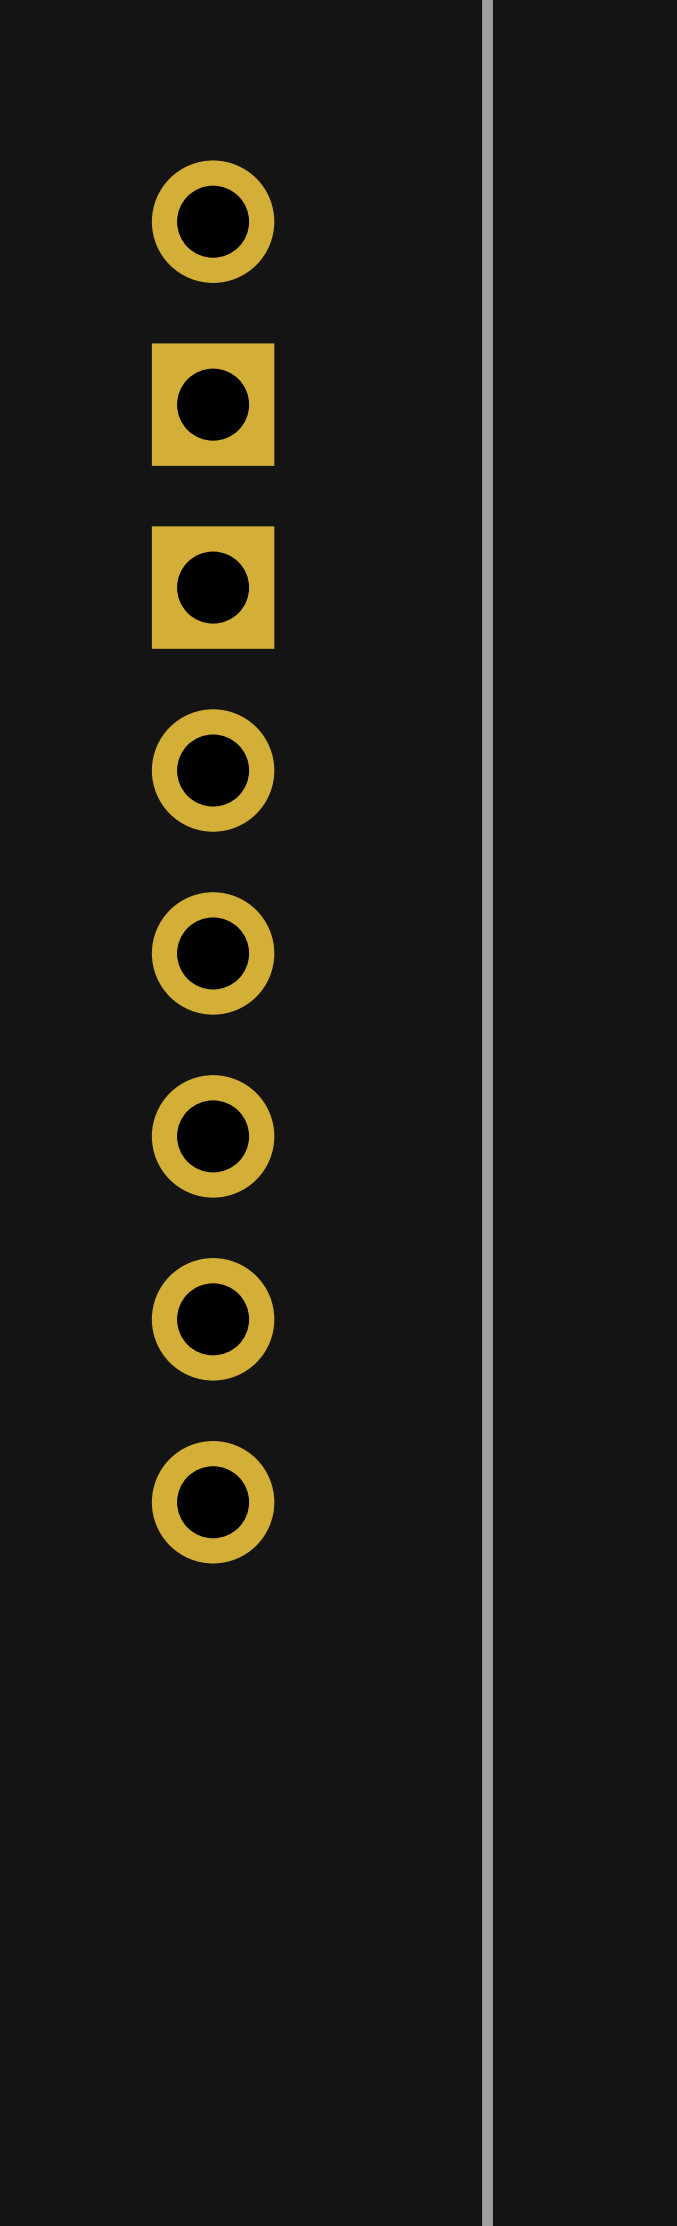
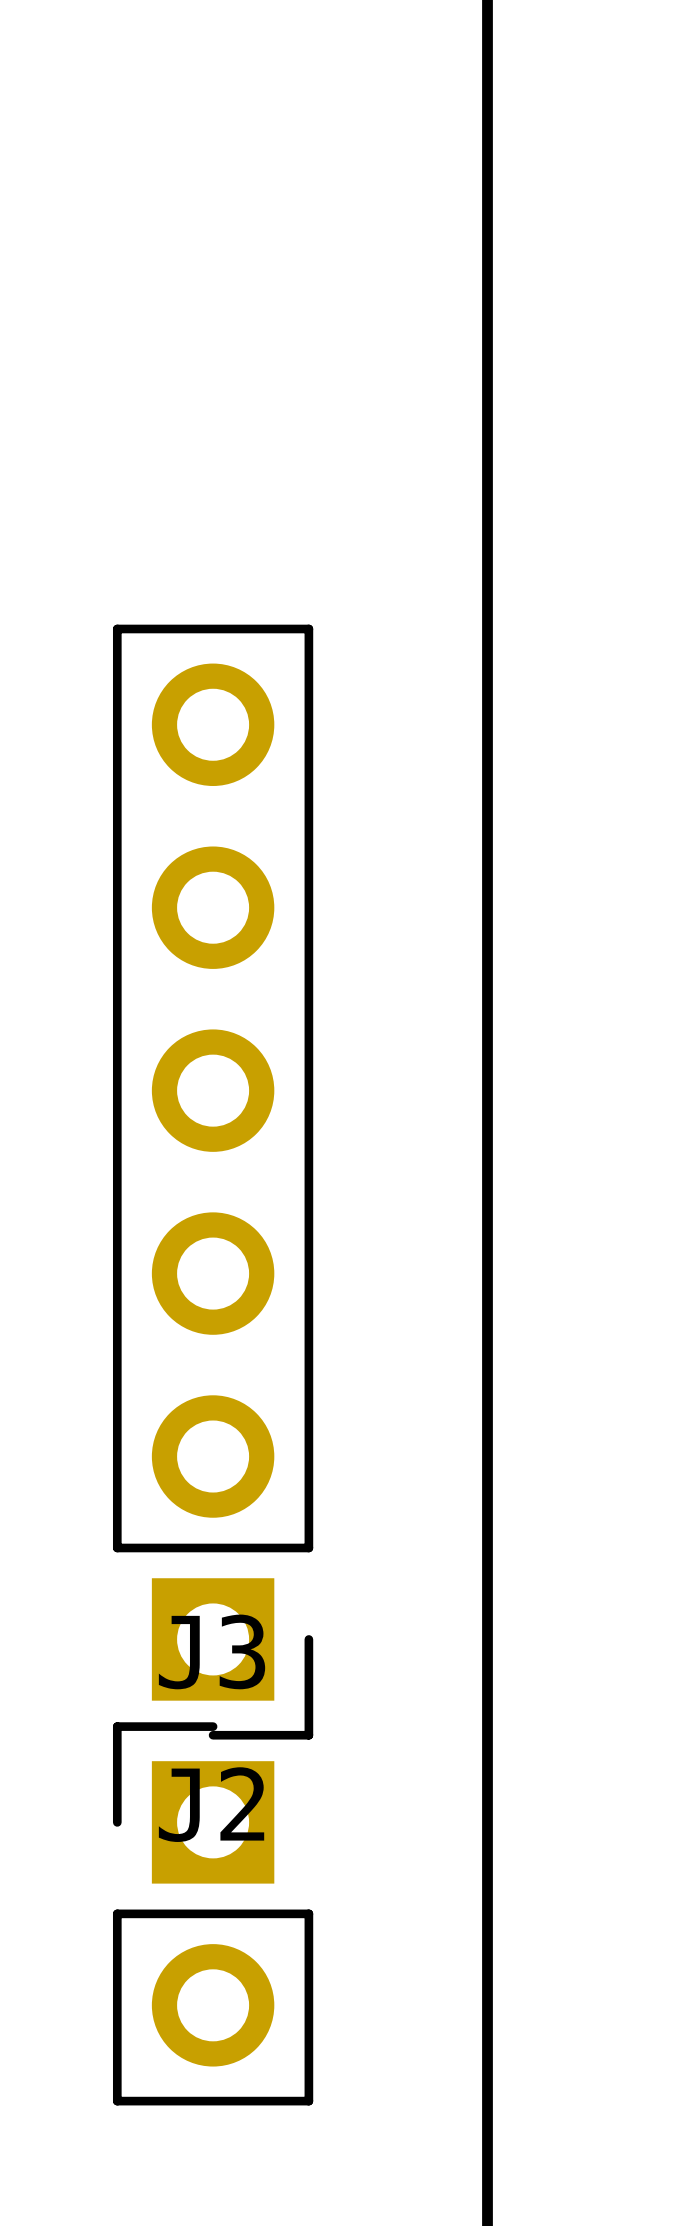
J3 side: top (213, 313) -> bottom (213, 1913)
J2 side: top (213, 1044) -> bottom (213, 1182)

